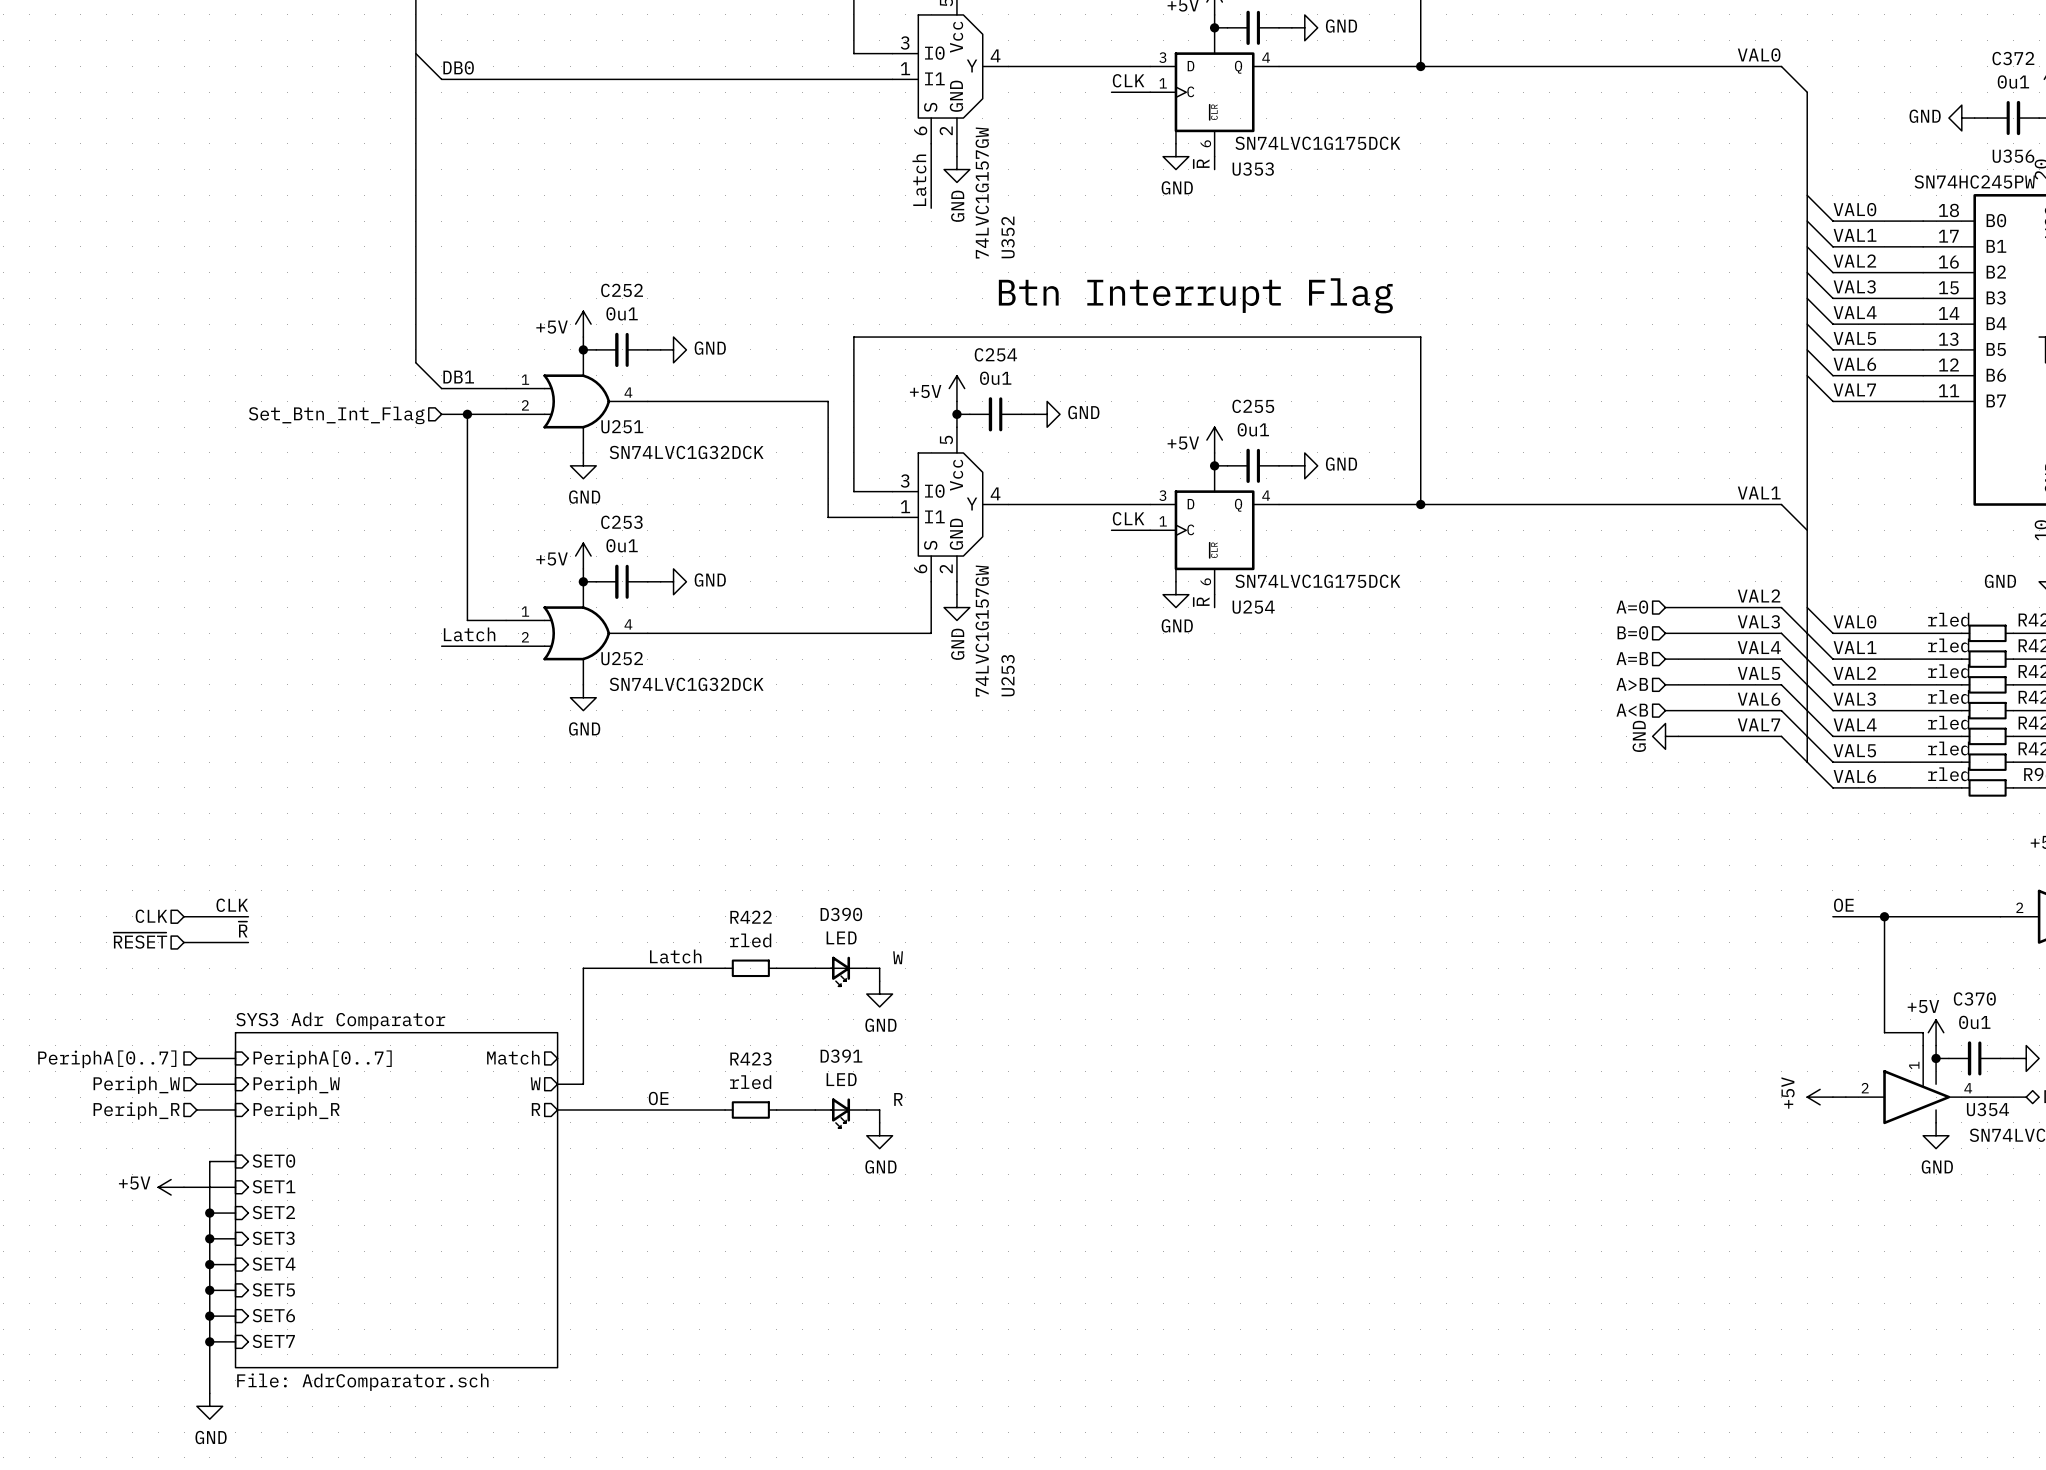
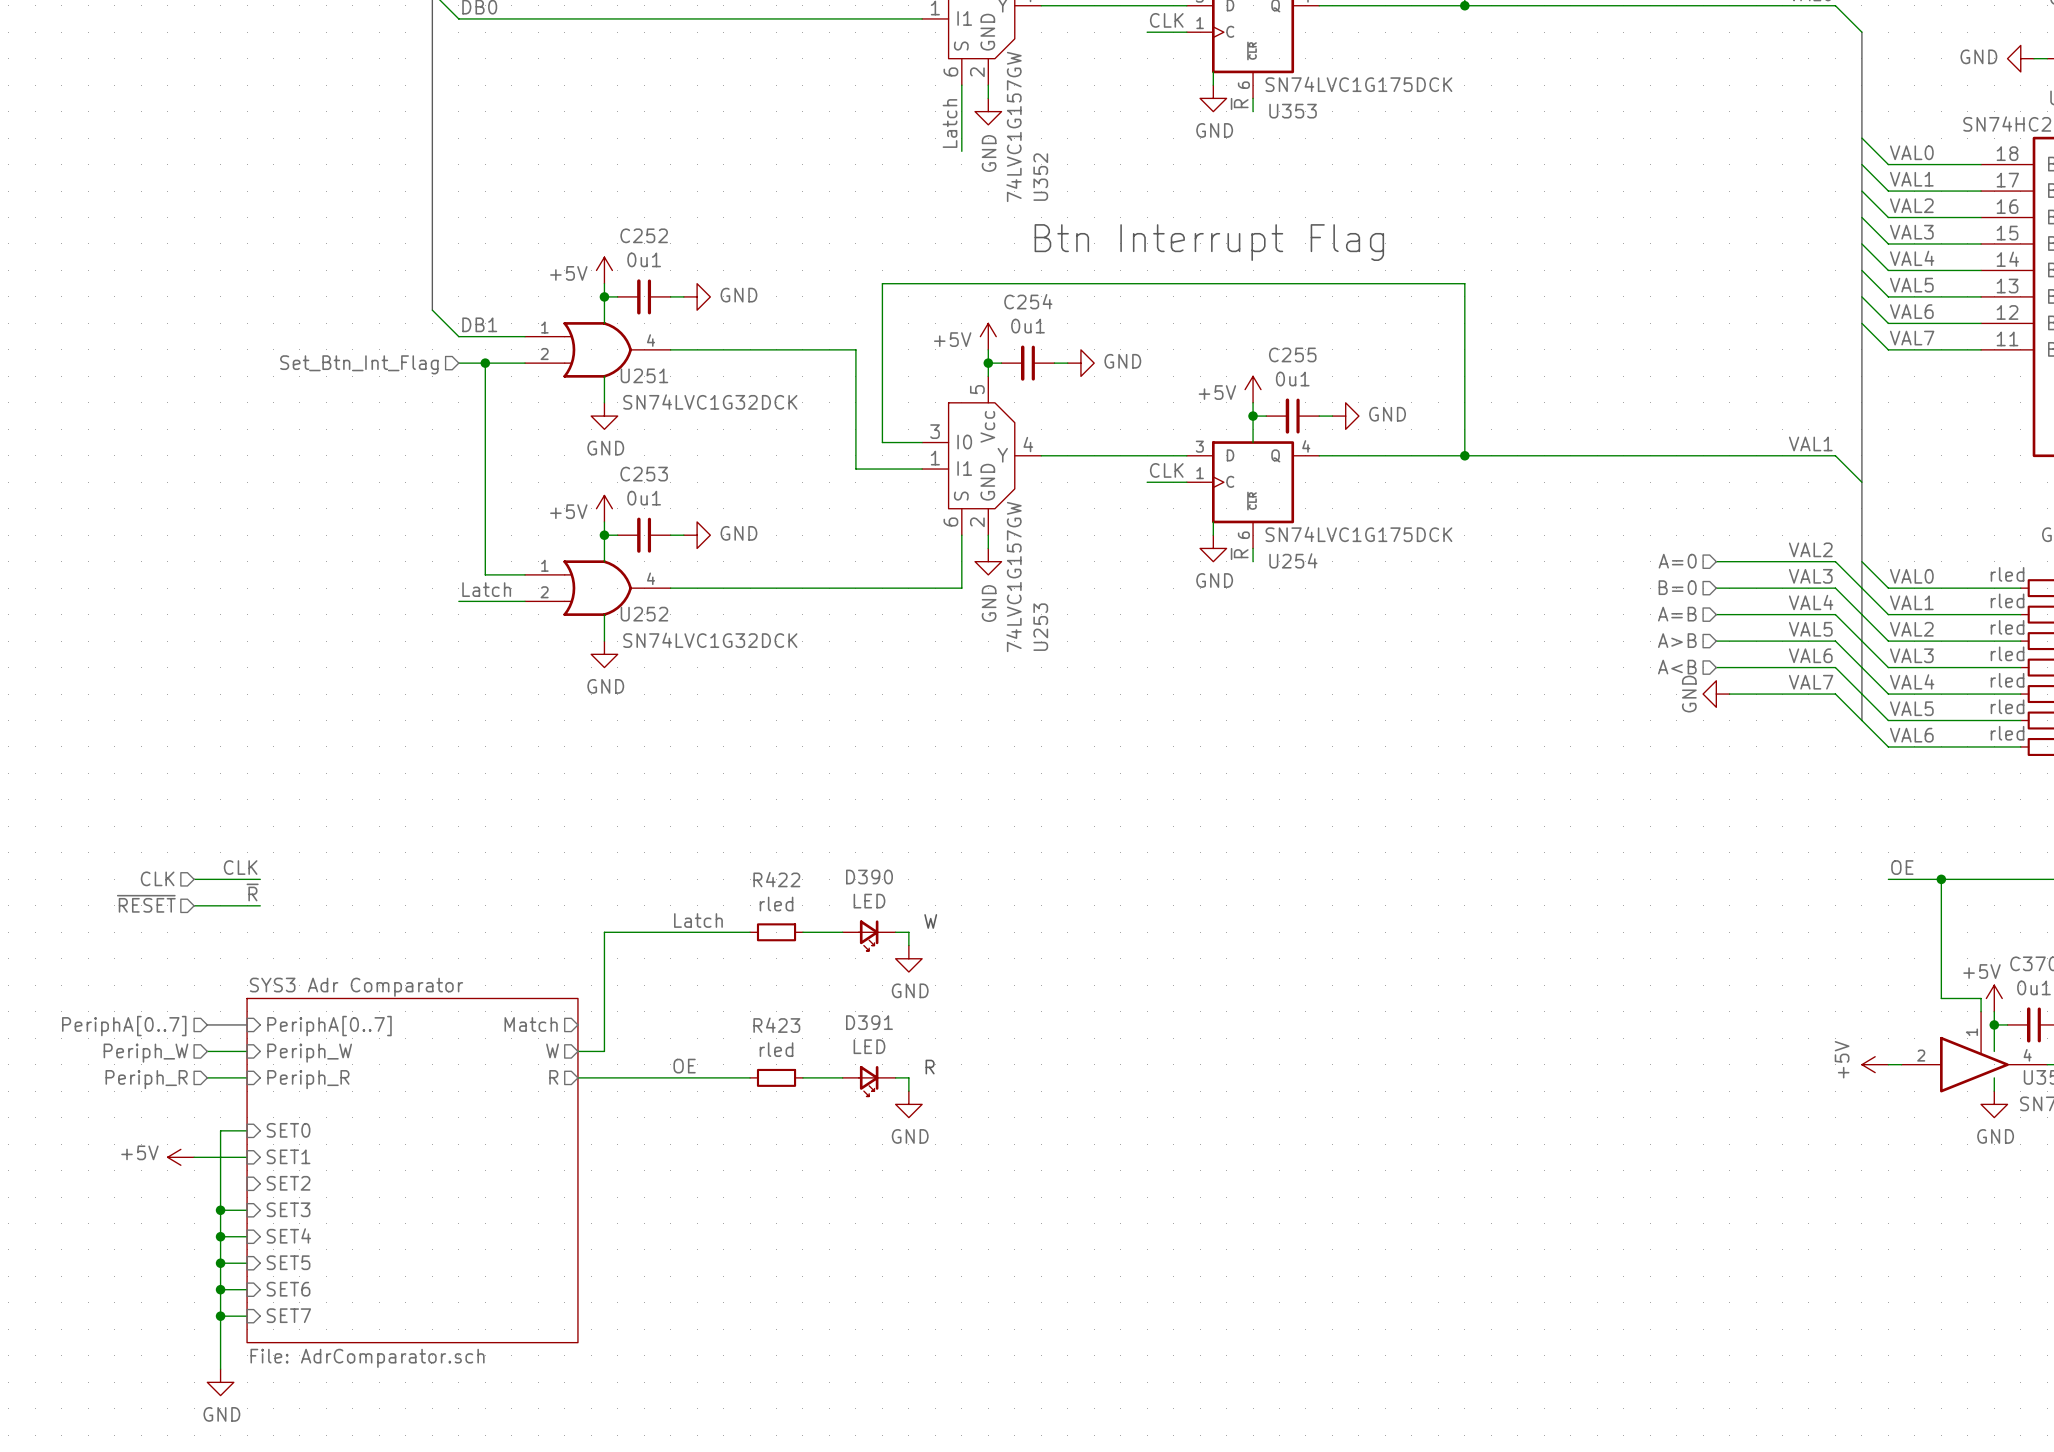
wire: (209, 1213) (235, 1213) -> none
junction: (209, 1213) -> none

